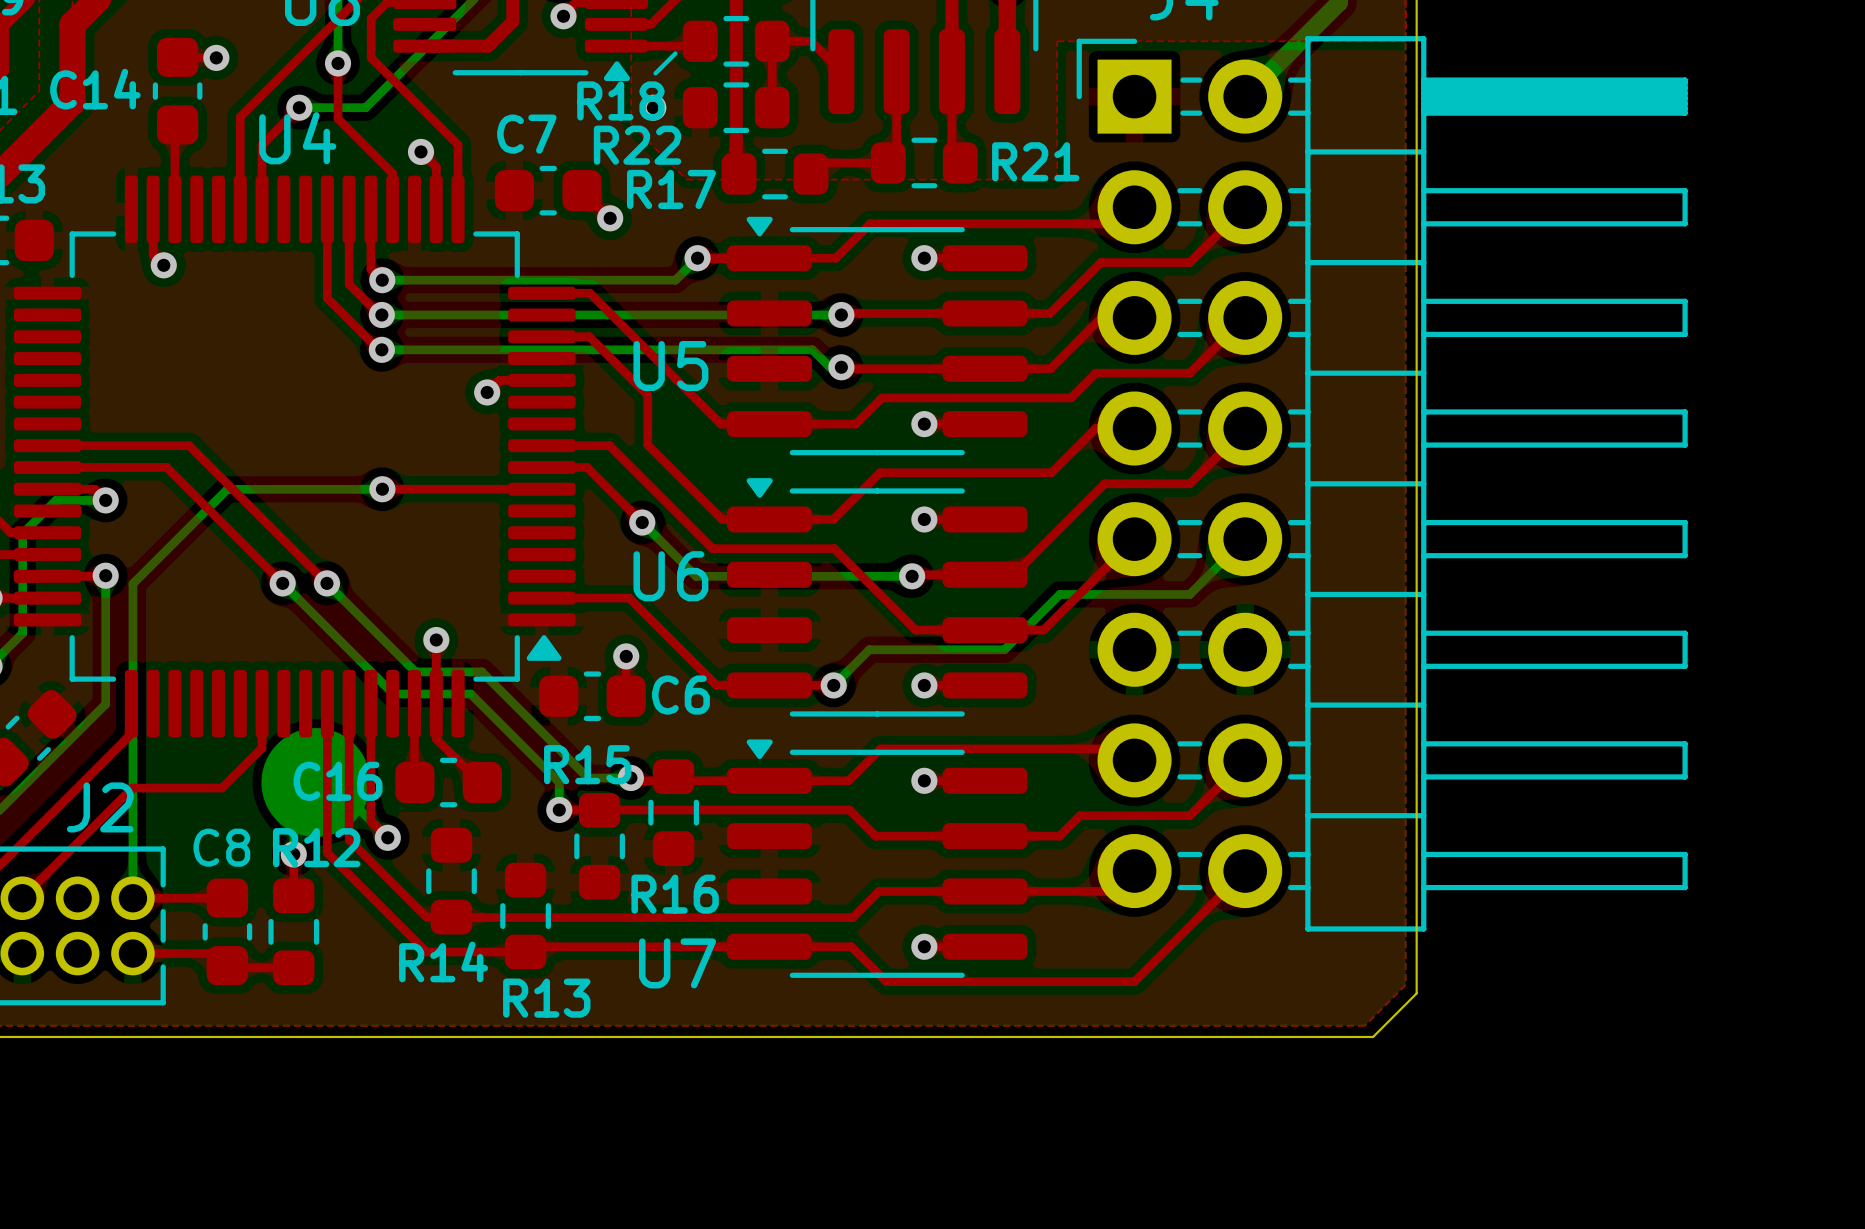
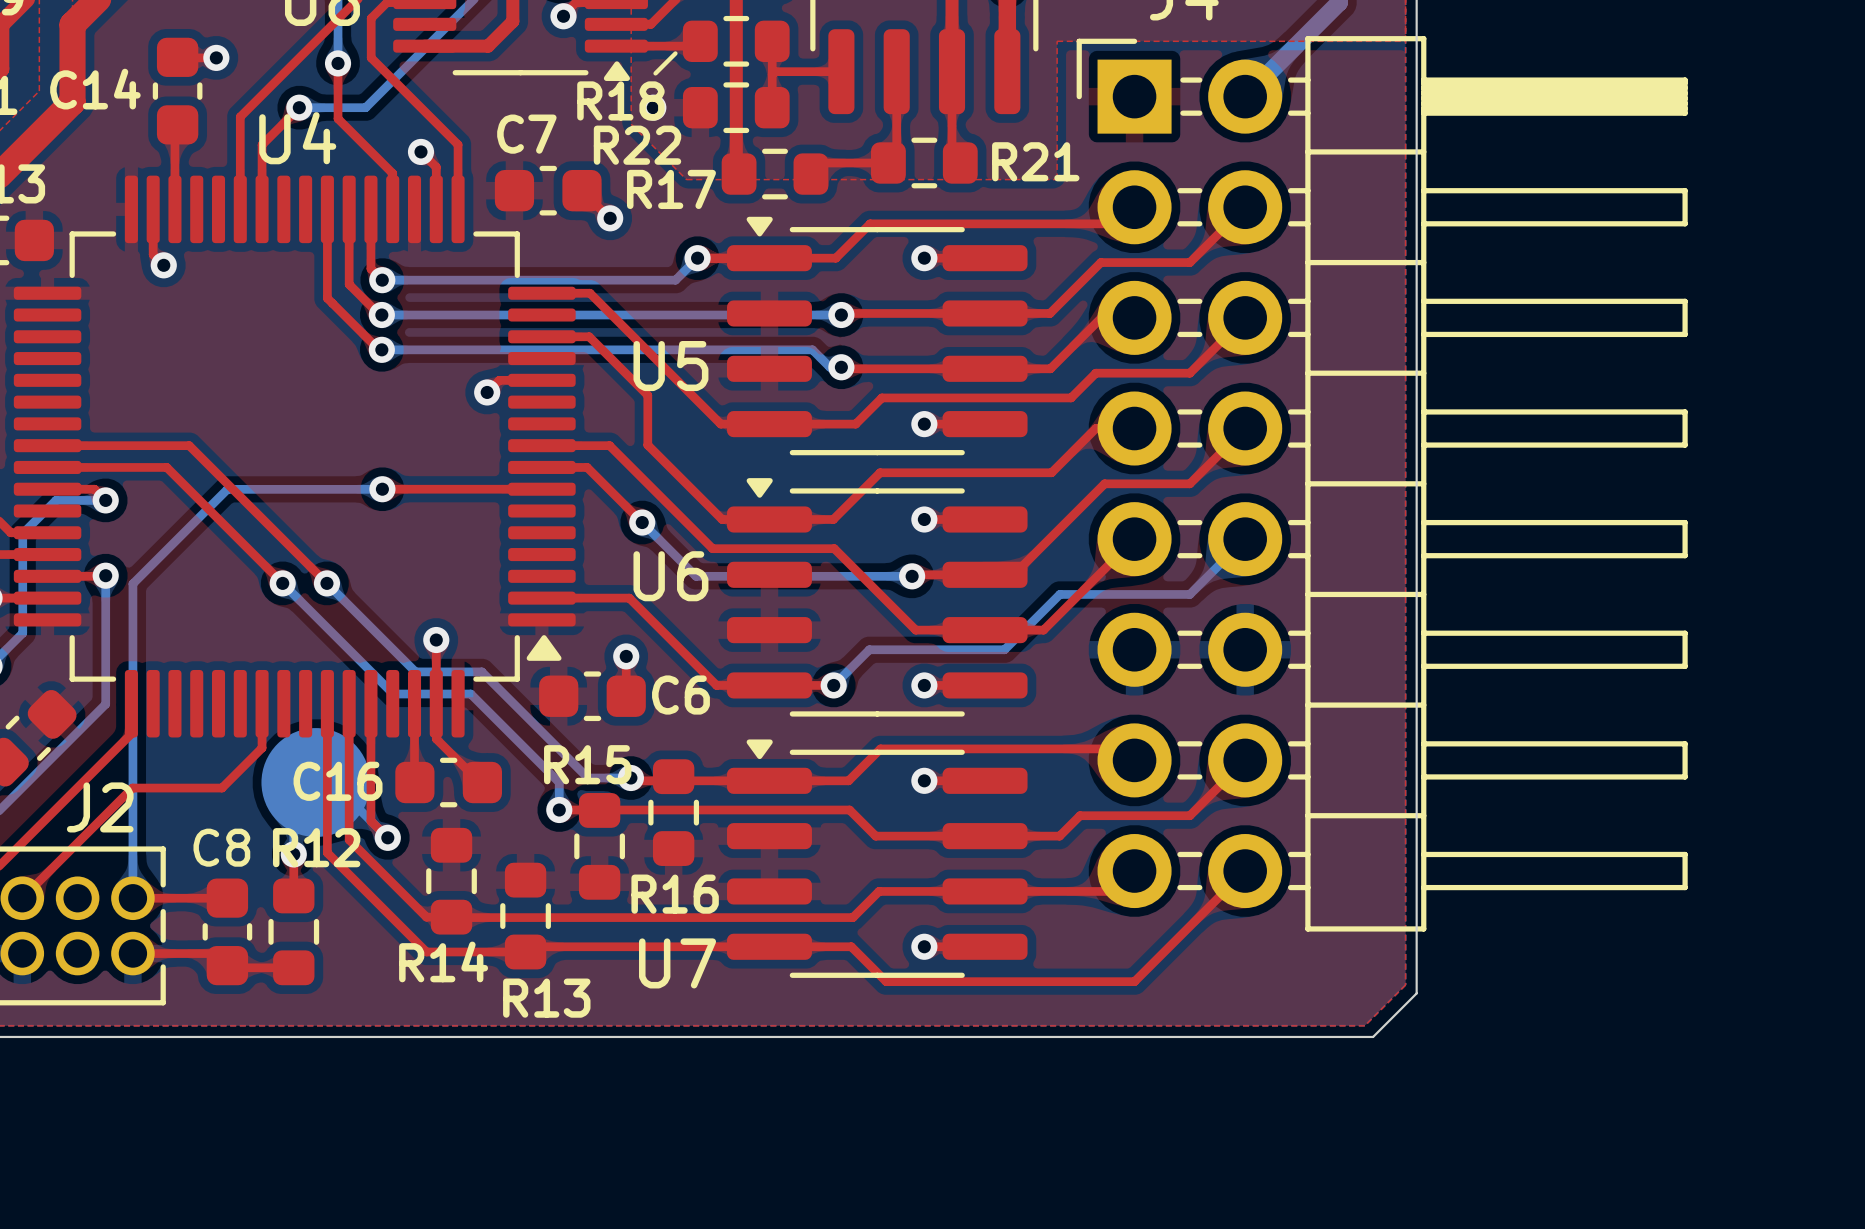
top track: (772, 41) (811, 41) (841, 71) -> (772, 74) (775, 71) (841, 71)

